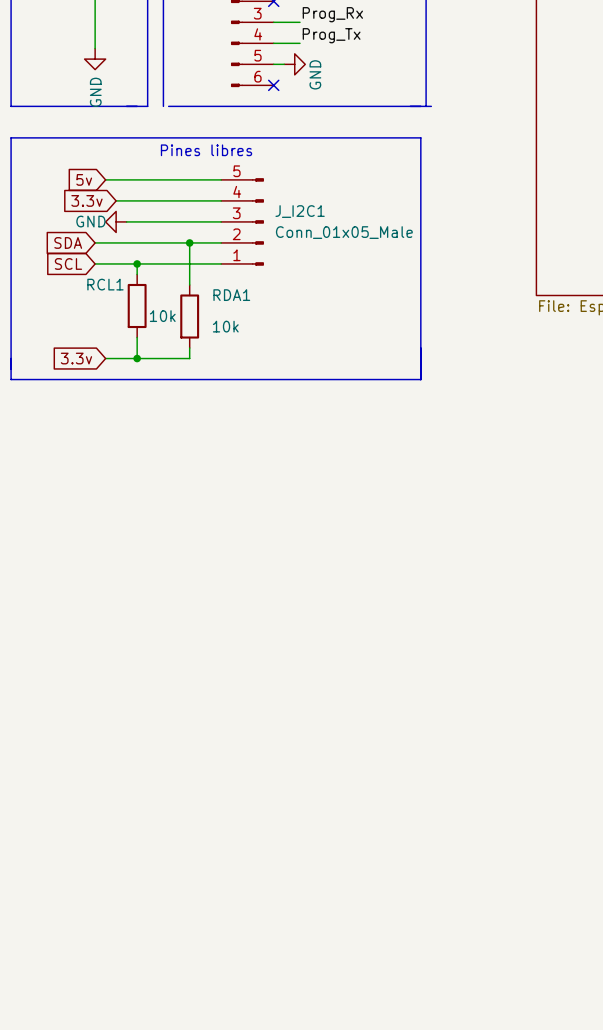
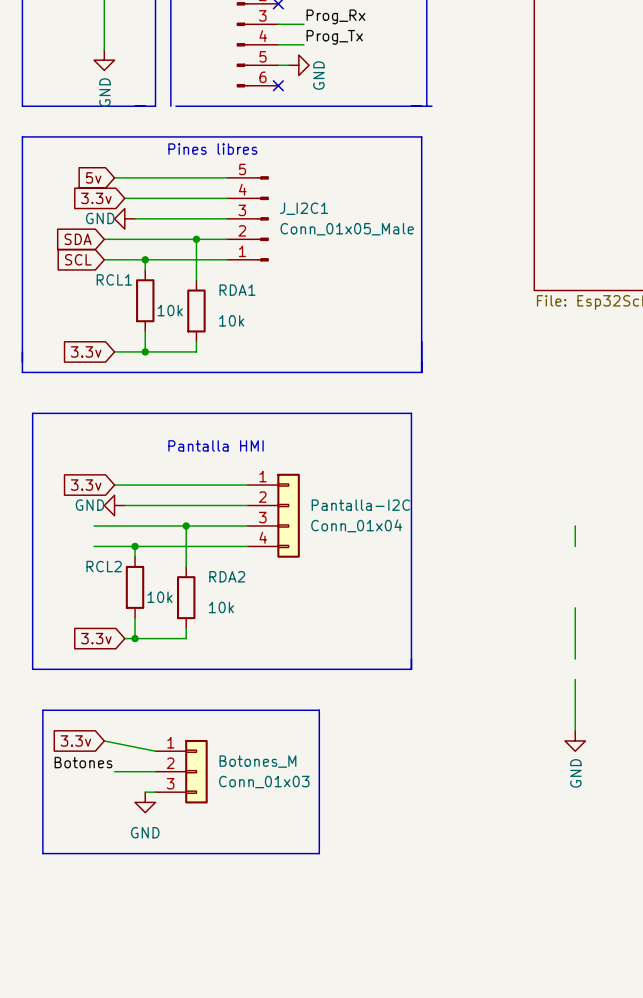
line: none -> (32, 413) (32, 669) (411, 669) (411, 413) (32, 413)
text: none -> Pantalla HMI (216, 445)
global label: none -> 3.3v (86, 485)
wire: none -> (114, 485) (247, 485)
power symbol: none -> GND (114, 505)
wire: none -> (124, 505) (247, 505)
Pantalla-I2C: none -> Conn_01x04 (273, 515)
wire: none -> (94, 525) (247, 525)
wire: none -> (186, 525) (186, 566)
junction: none -> (186, 525)
wire: none -> (575, 525) (575, 546)
wire: none -> (94, 546) (247, 546)
wire: none -> (135, 546) (135, 556)
junction: none -> (135, 546)
RCL2: none -> 10k (135, 587)
RDA2: none -> 10k (186, 597)
wire: none -> (575, 607) (575, 659)
wire: none -> (135, 618) (135, 638)
wire: none -> (186, 628) (186, 638) (124, 638)
global label: none -> 3.3v (96, 638)
junction: none -> (135, 638)
wire: none -> (575, 679) (575, 730)
line: none -> (42, 710) (42, 853) (319, 853) (319, 710) (42, 710)
global label: none -> 3.3v (75, 740)
wire: none -> (104, 740) (155, 751)
power symbol: none -> GND (575, 740)
label: none -> Botones (83, 762)
wire: none -> (114, 771) (155, 771)
Botones_M: none -> Conn_01x03 (181, 771)
wire: none -> (145, 792) (155, 792)
power symbol: none -> GND (145, 802)

